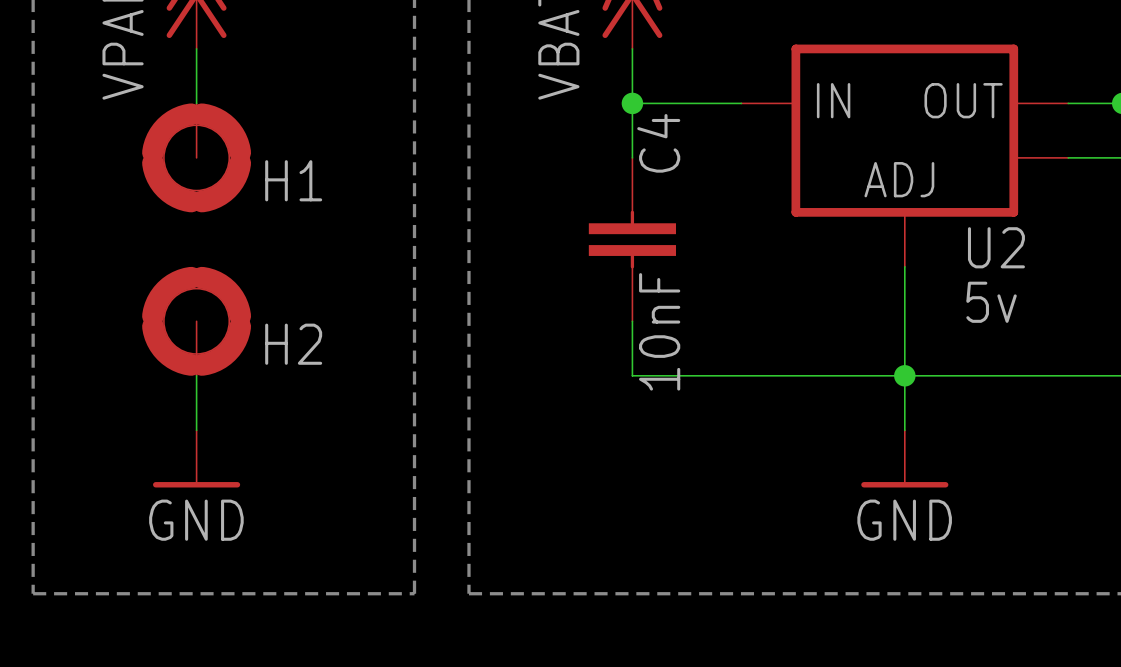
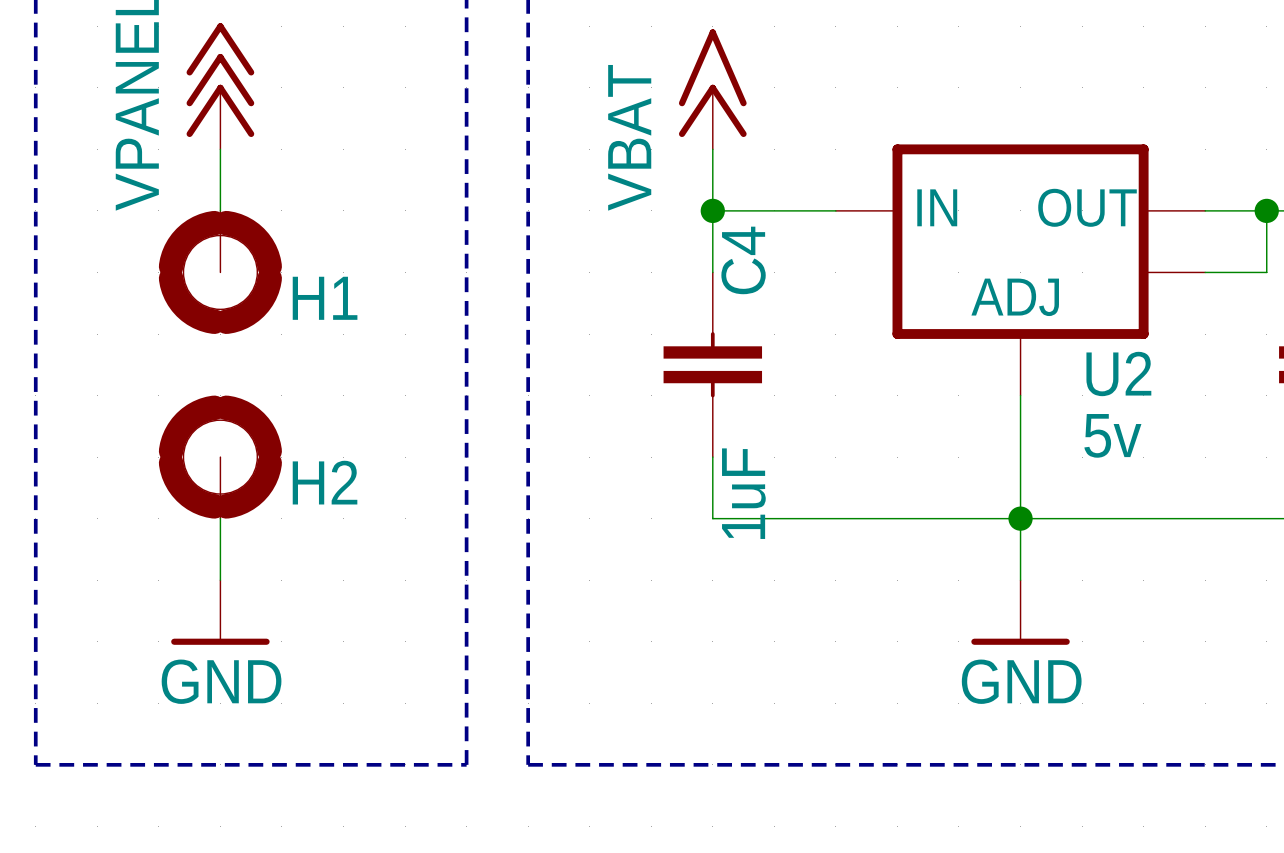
C4 value: 10nF (659, 331) -> 1uF (743, 493)

